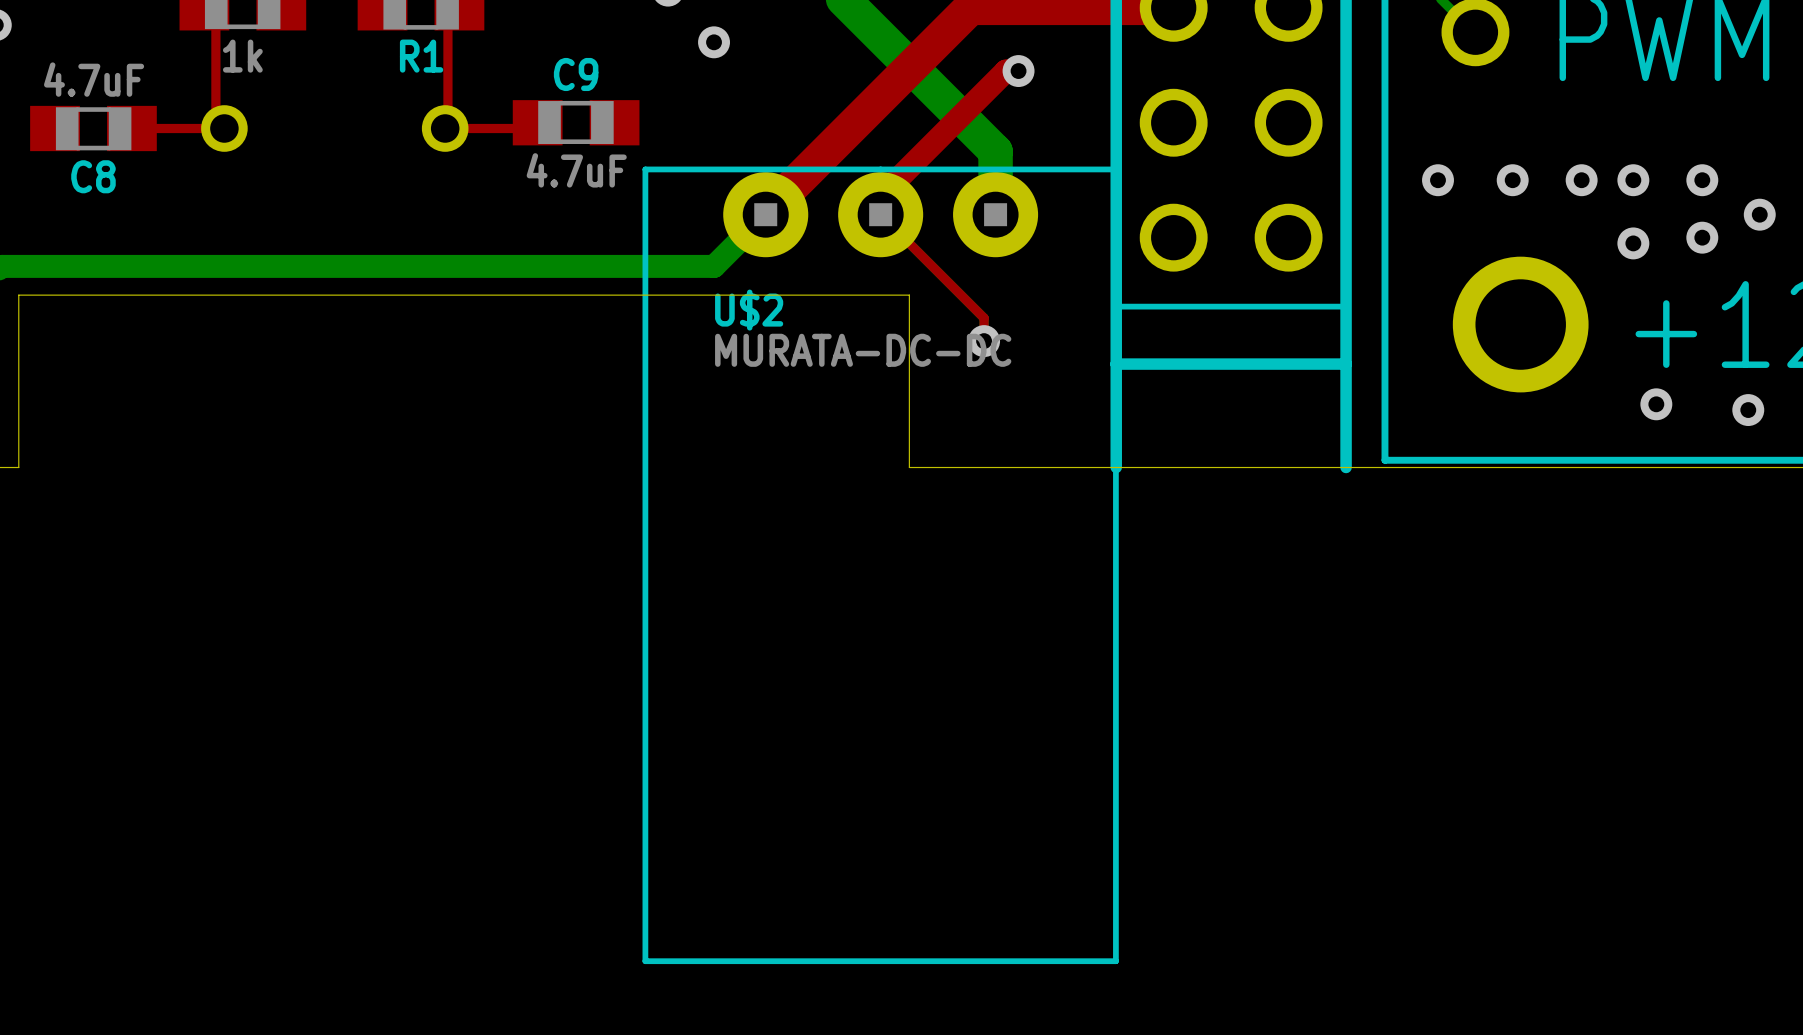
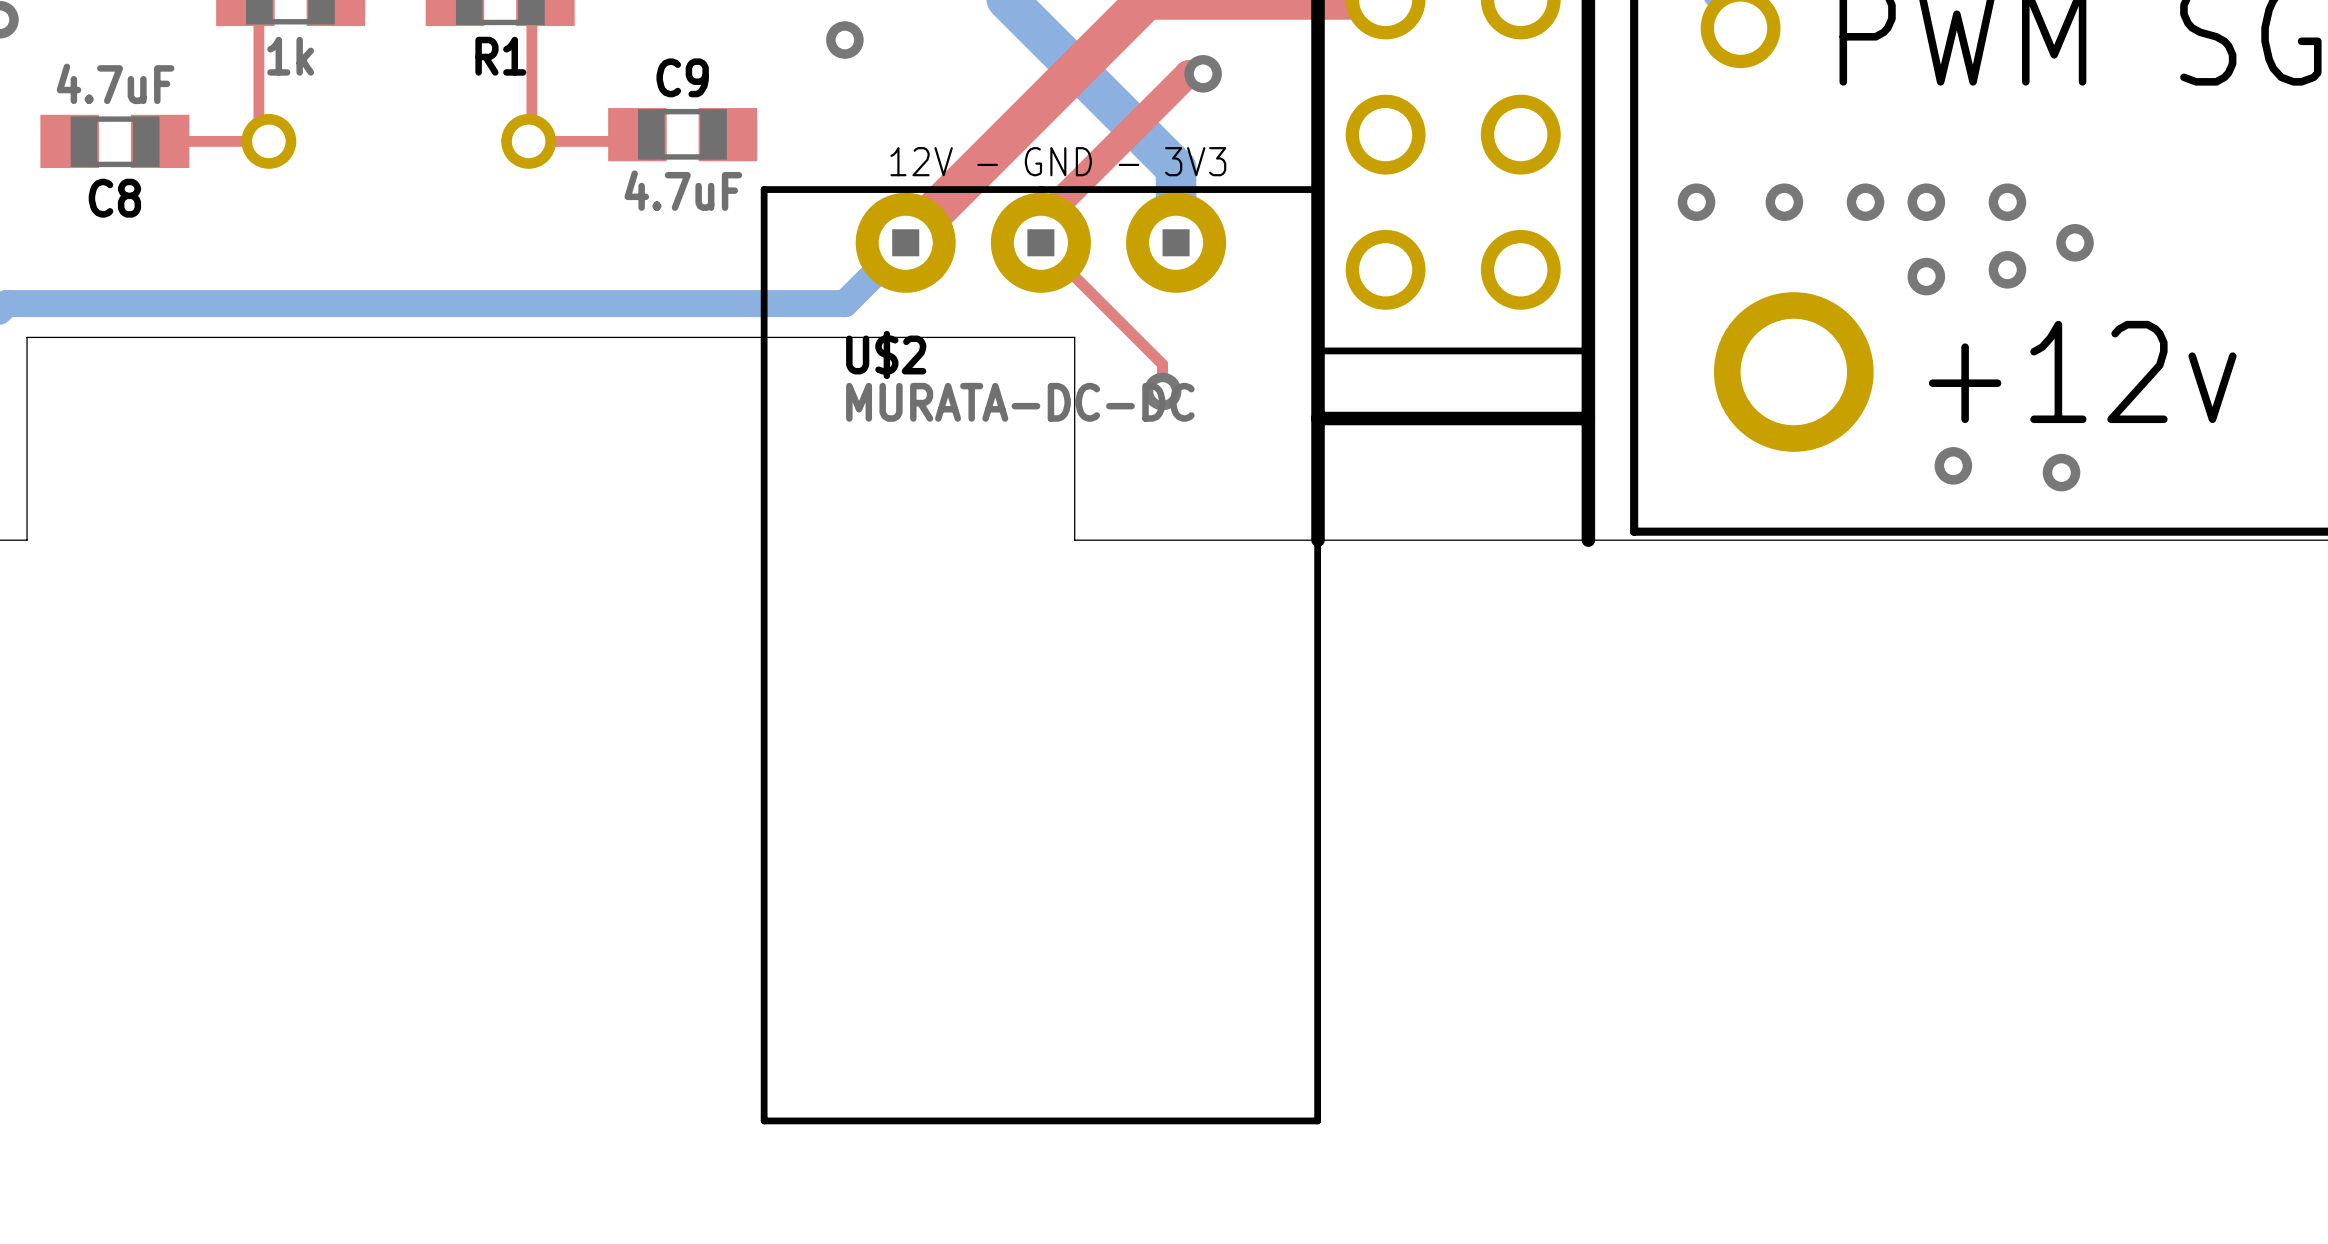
text: none -> 12V - GND - 3V3 (1058, 161)

